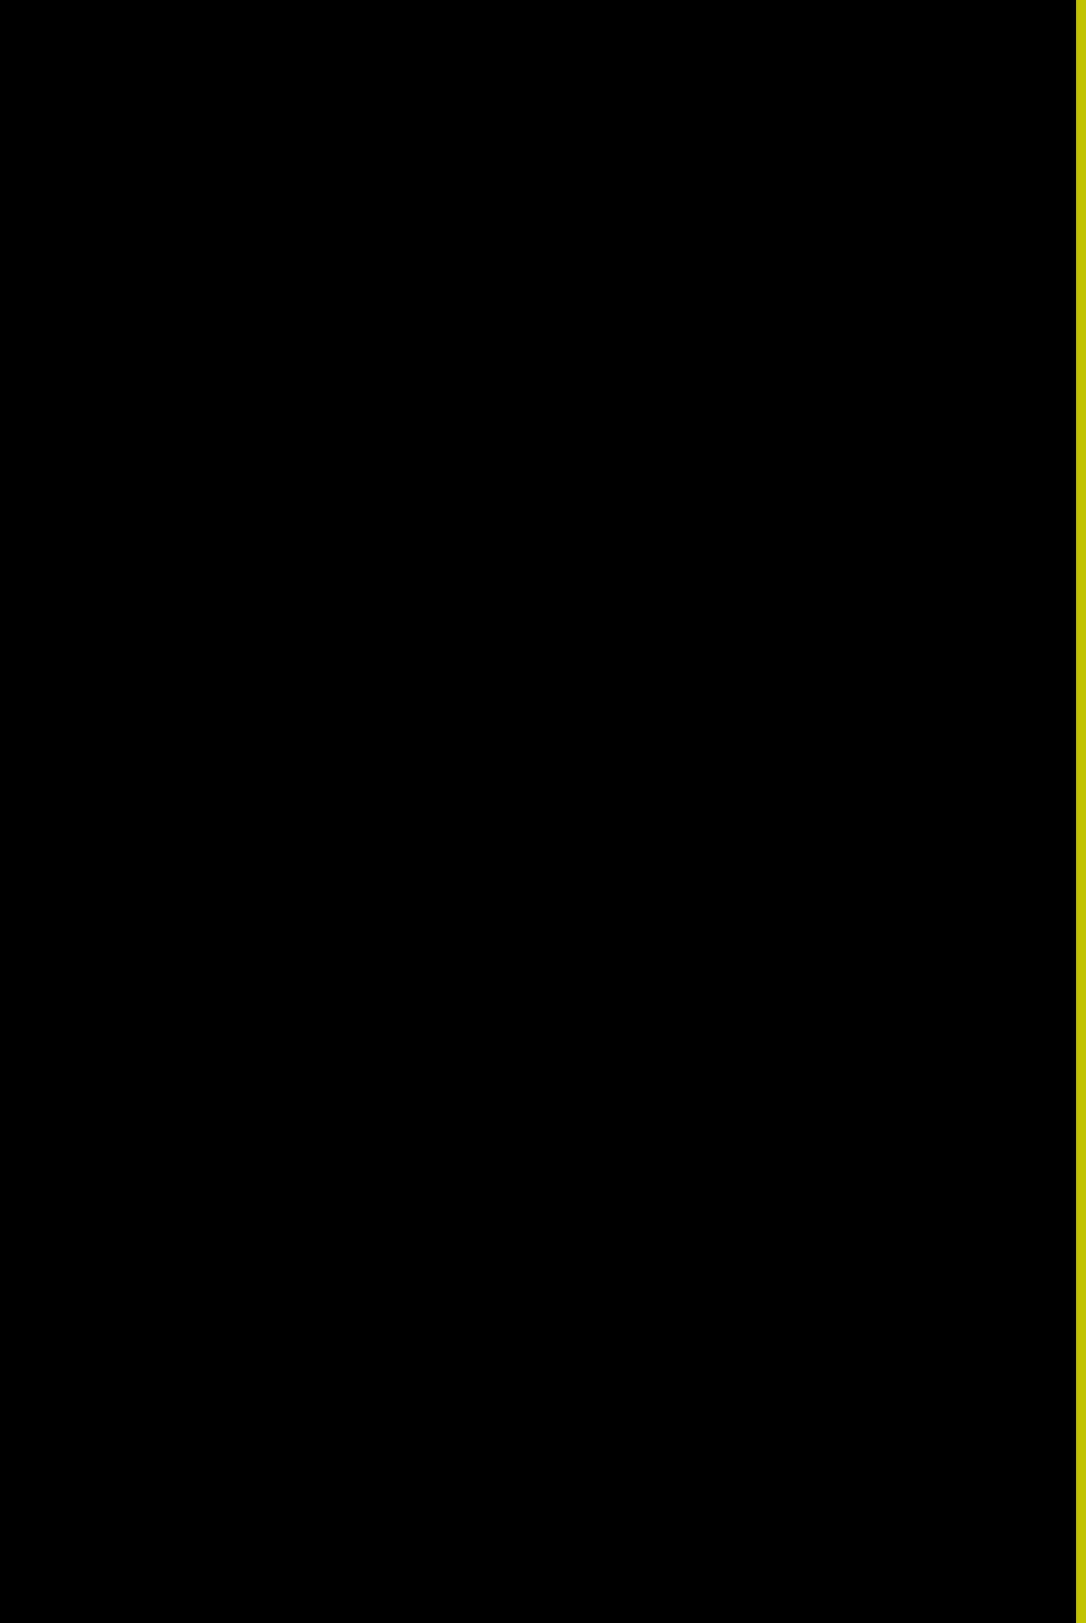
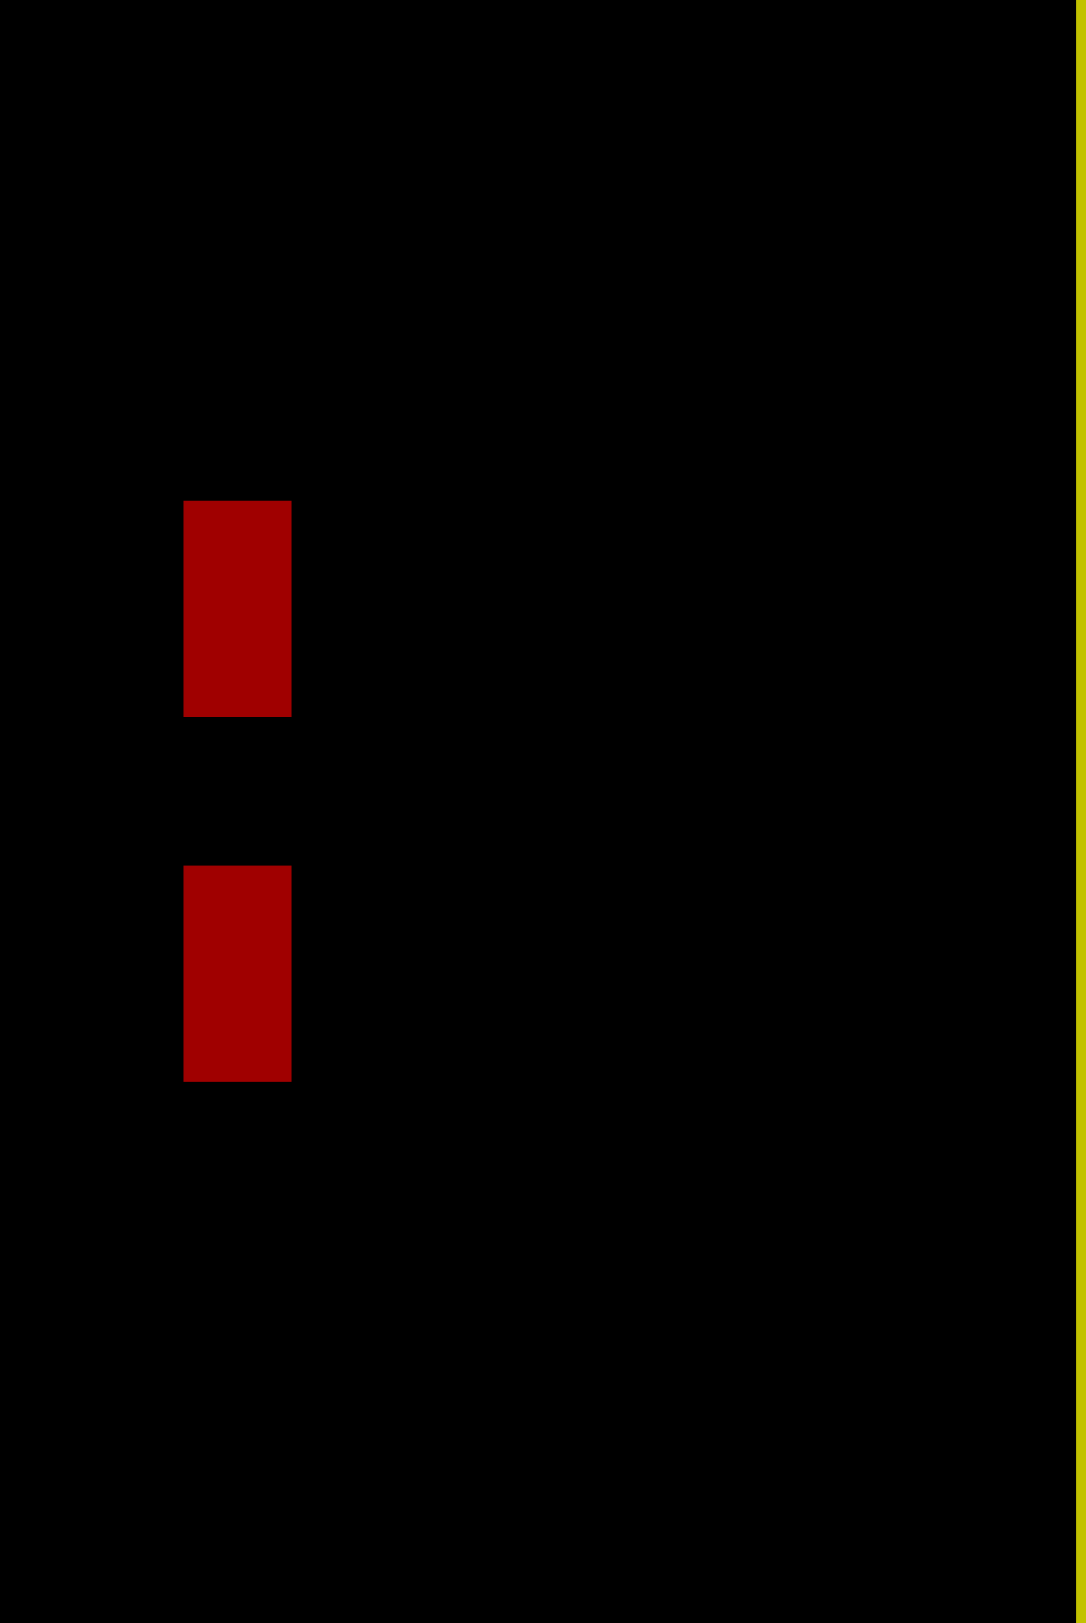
part: none -> (237, 791)

